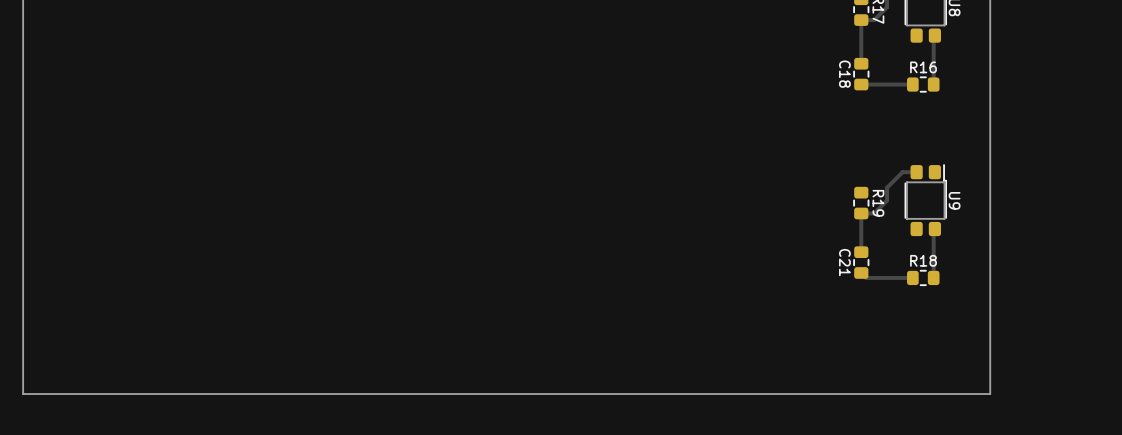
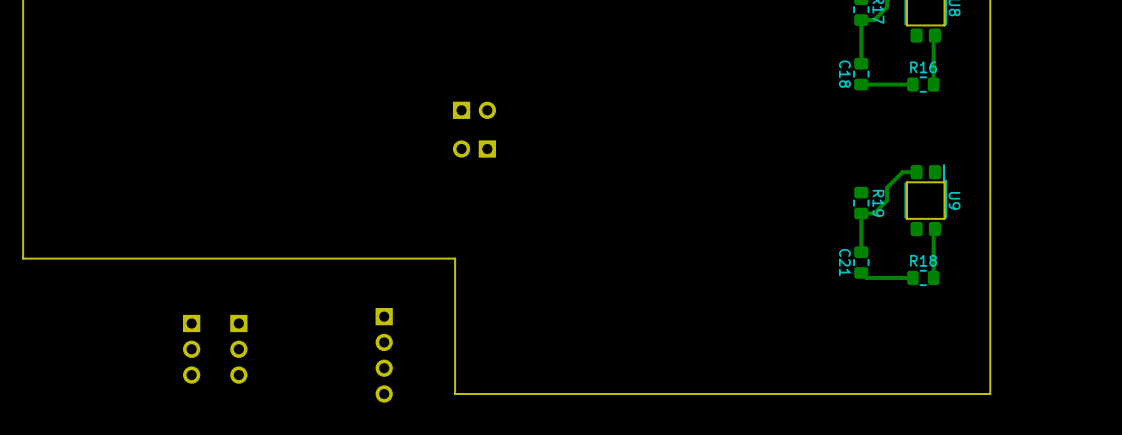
part: none -> (474, 110)
part: none -> (474, 149)
board edge: (23, 258) (23, 394) (455, 394) -> (23, 258) (455, 258) (455, 394)
part: none -> (191, 349)
part: none -> (238, 349)
part: none -> (384, 355)

